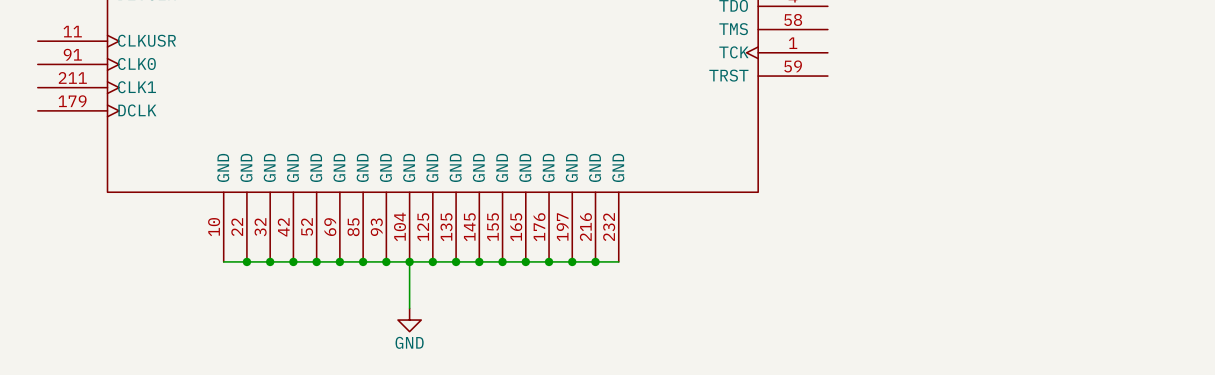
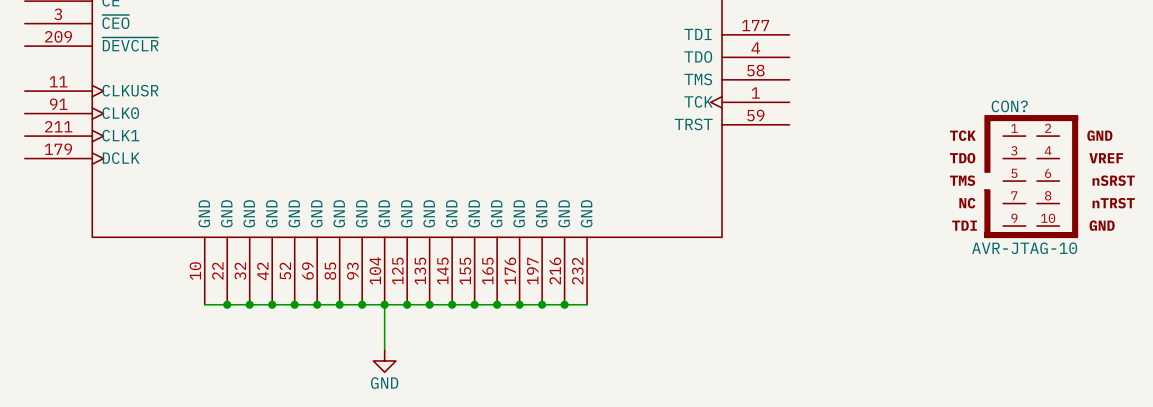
CON?: none -> AVR-JTAG-10 (1031, 176)

